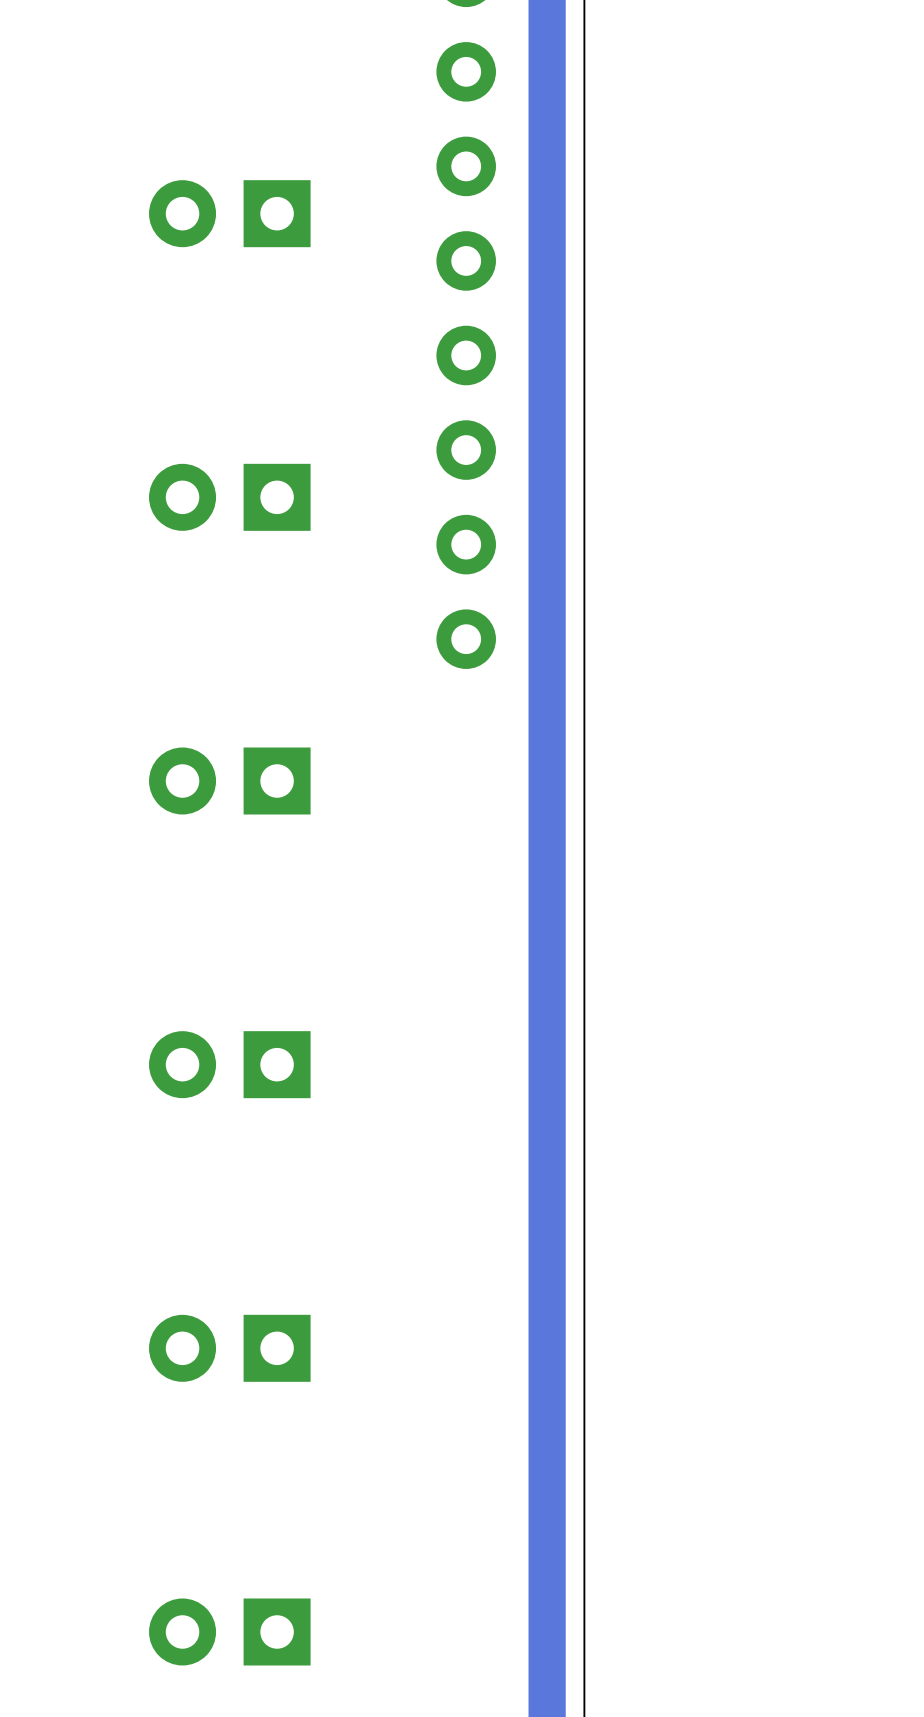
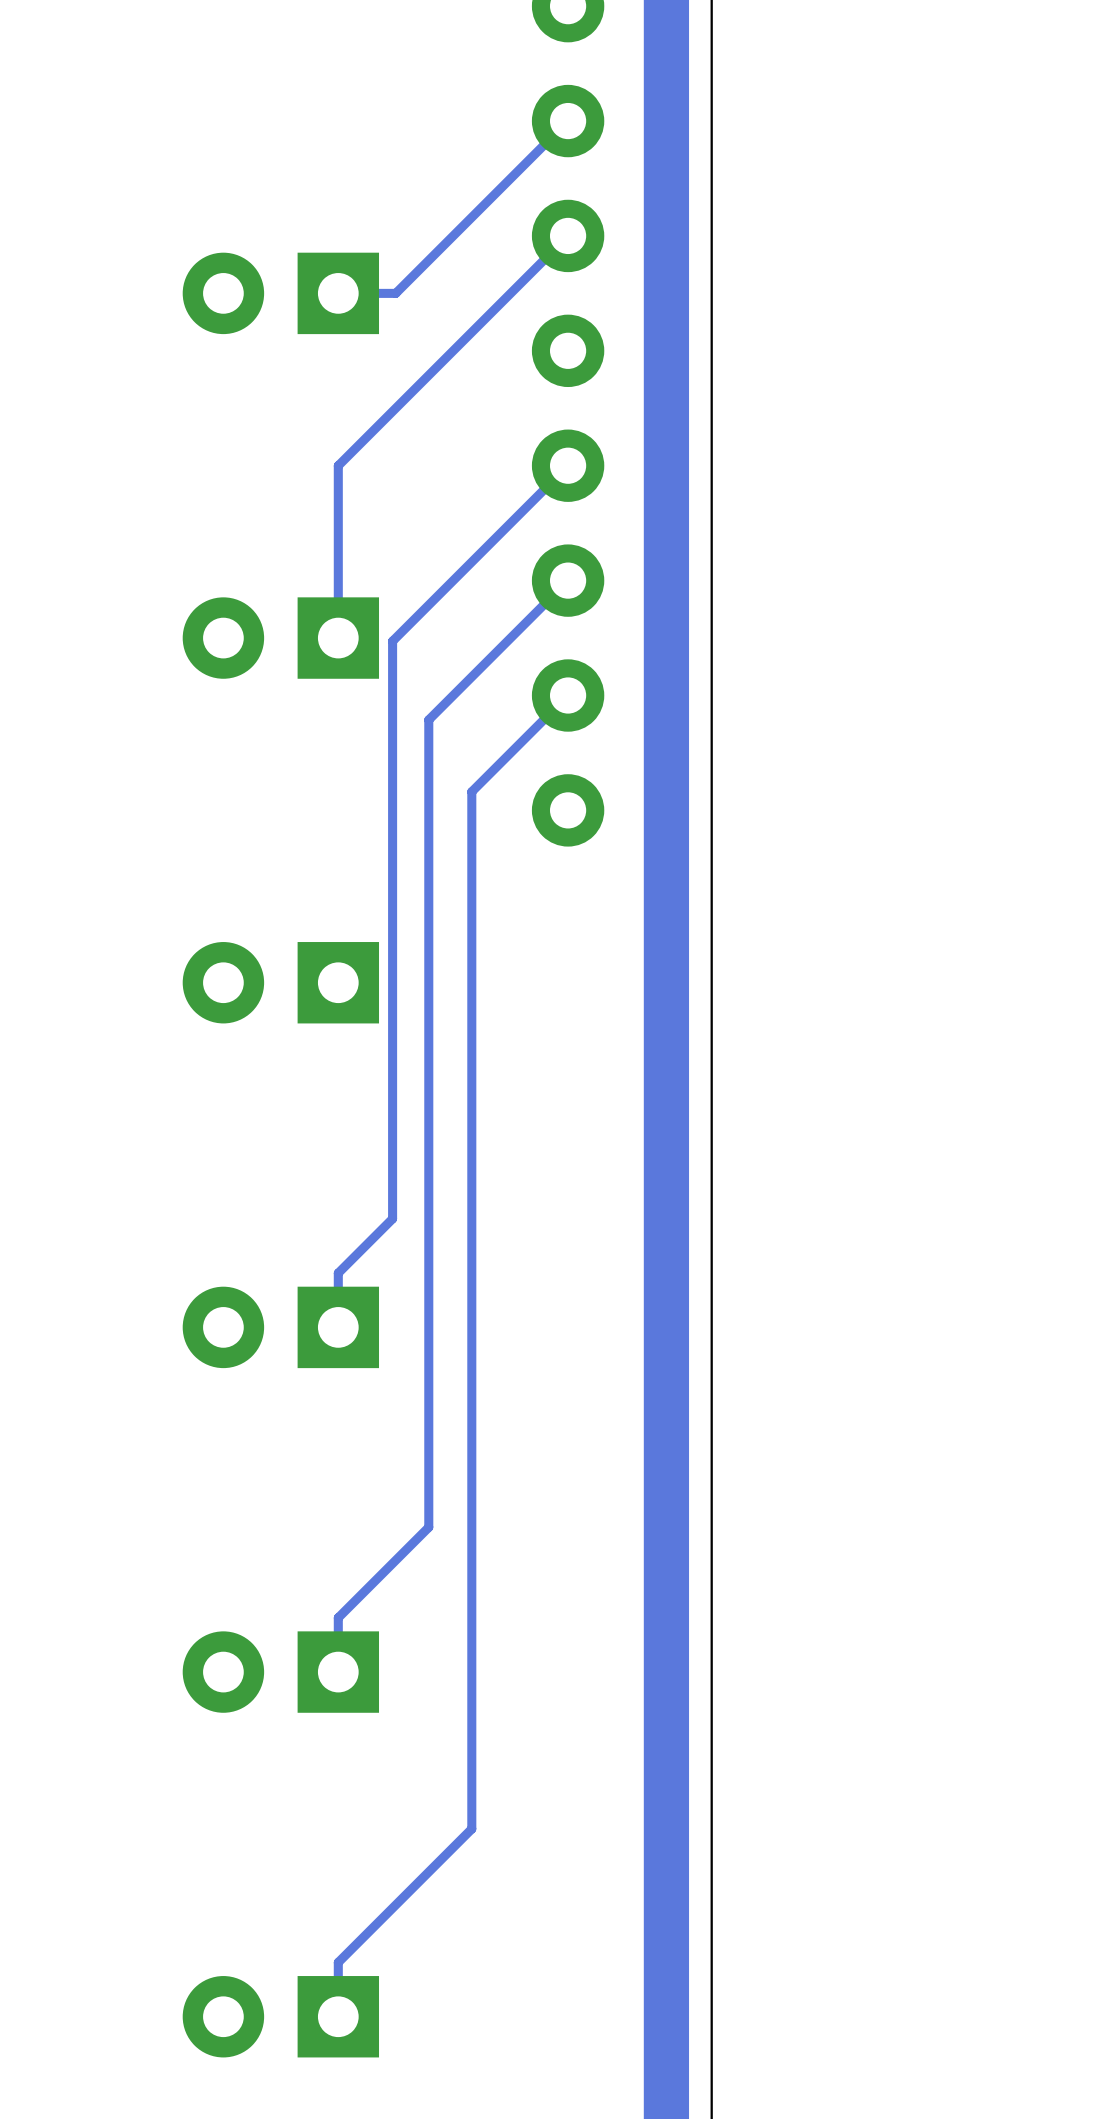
track: none -> (568, 121) (395, 293) (338, 293)
track: none -> (568, 235) (338, 465) (338, 638)
track: none -> (568, 465) (392, 641) (392, 1218) (338, 1273) (338, 1327)
track: none -> (568, 580) (428, 719) (428, 1527) (338, 1617) (338, 1672)
track: none -> (568, 695) (471, 791) (471, 1828) (338, 1962) (338, 2016)

